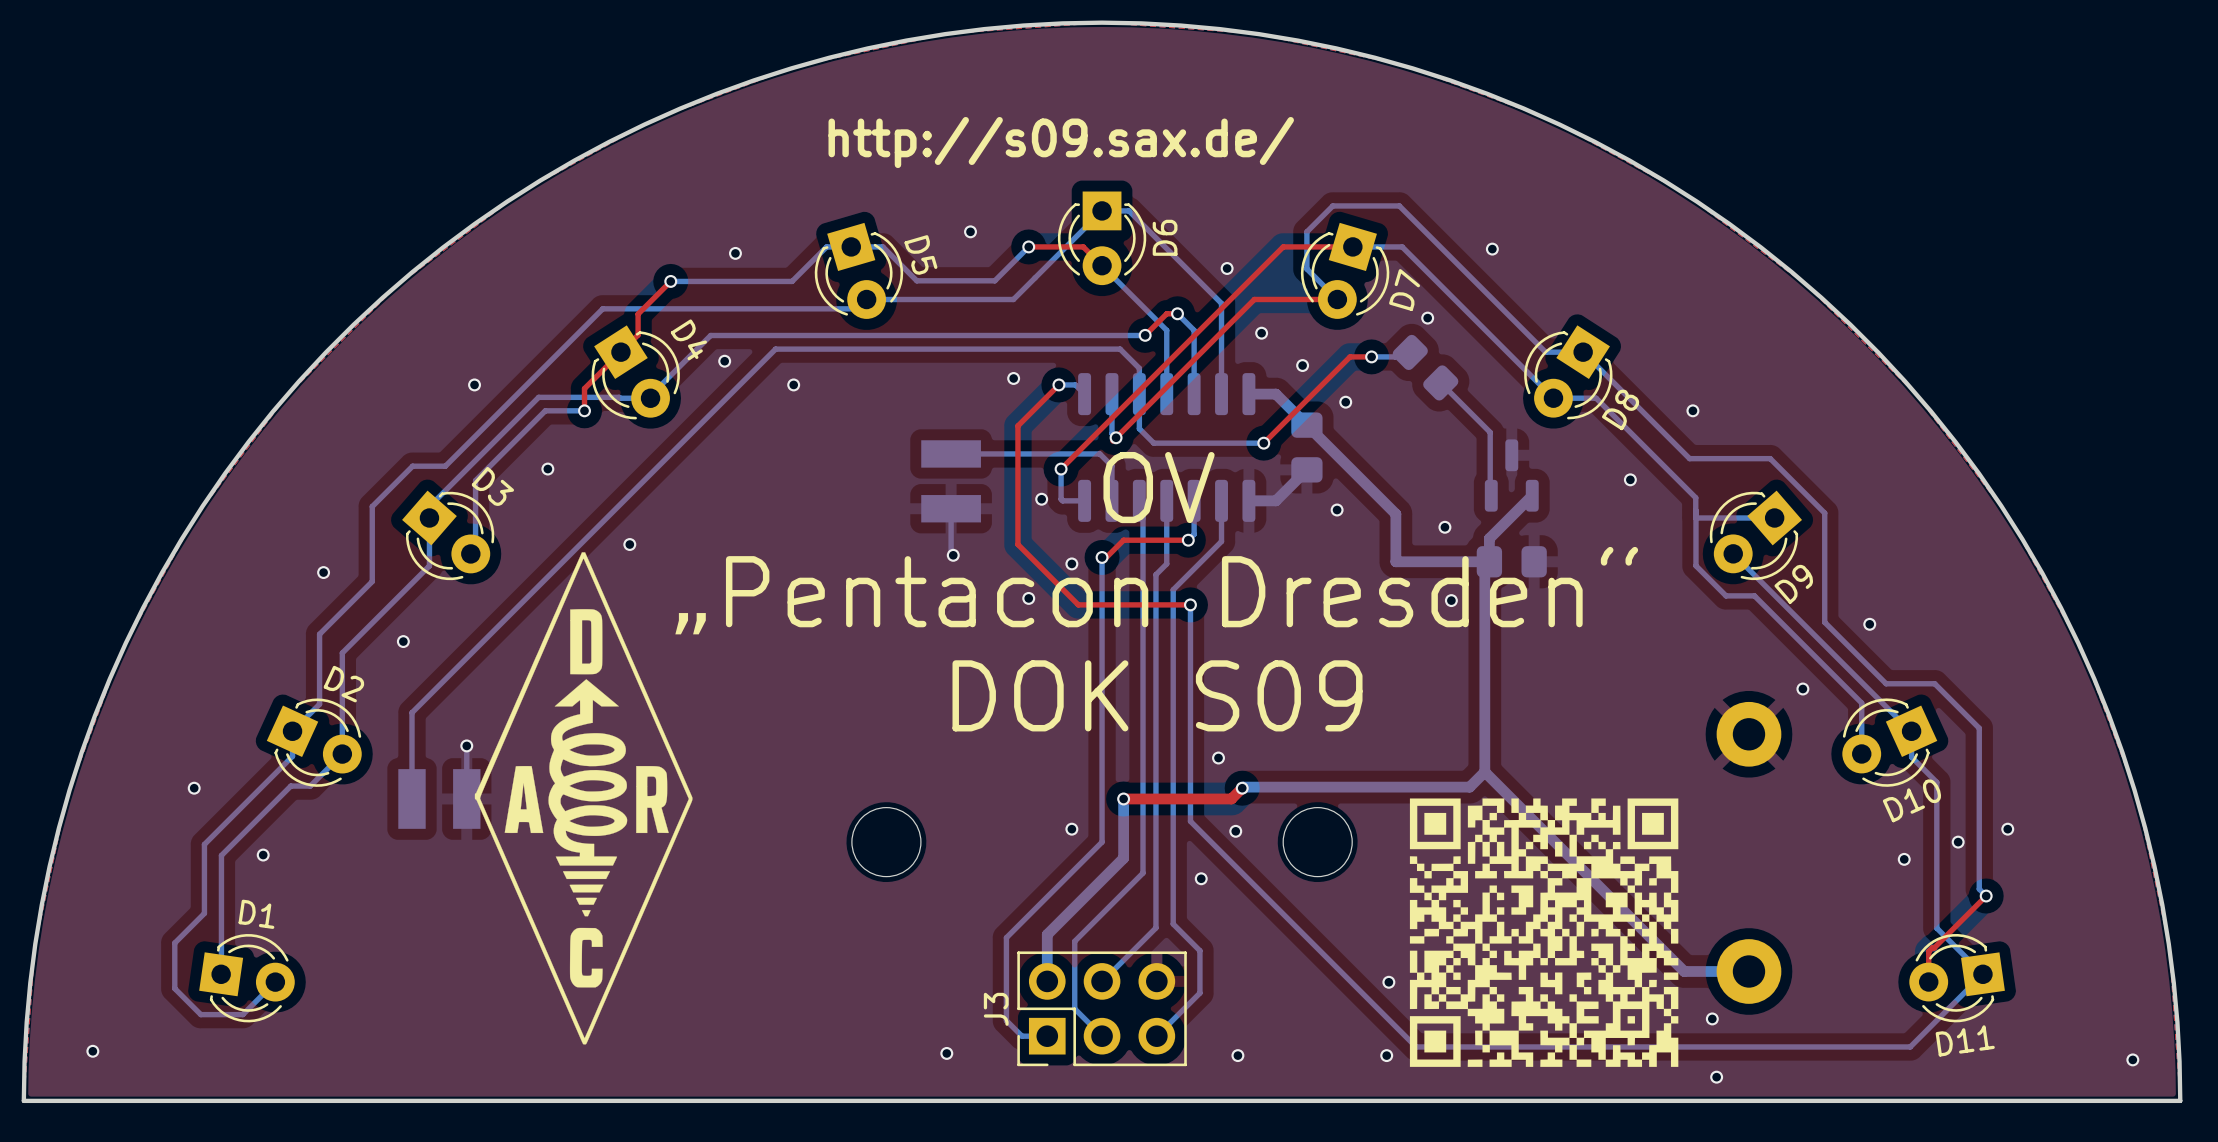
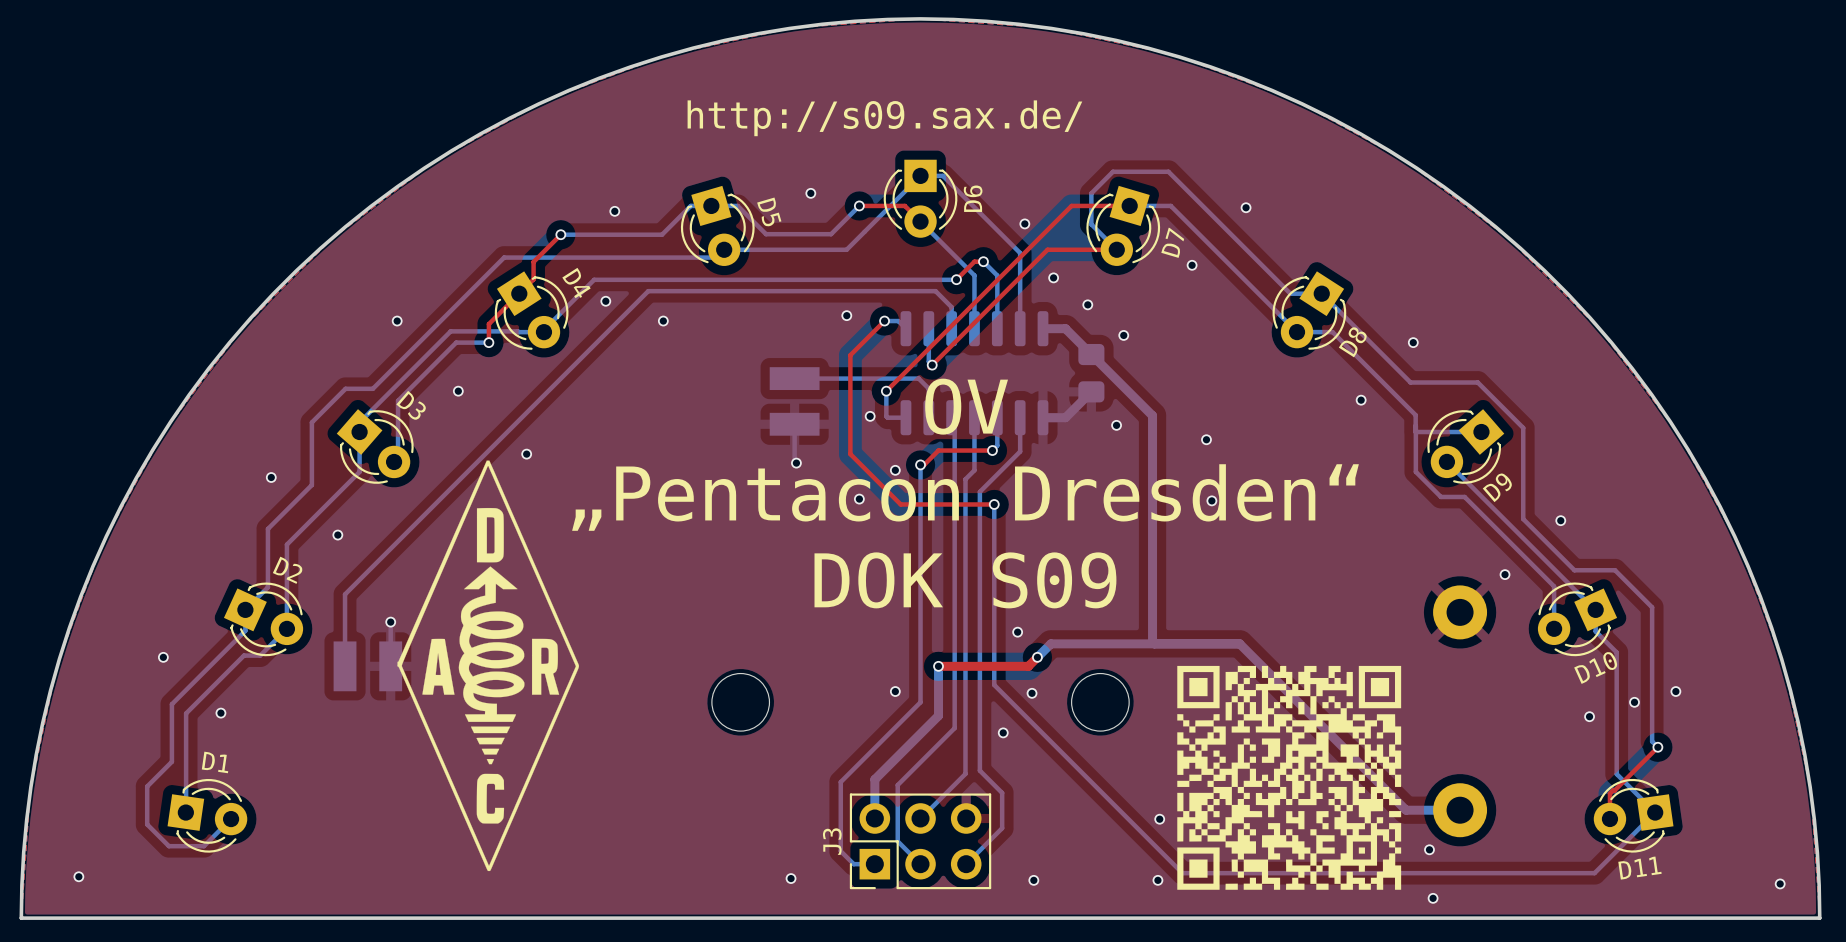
bottom track: (1404, 347) (1395, 356) (1371, 356) -> none
top track: (1371, 356) (1350, 356) (1263, 443) -> none
via: (1371, 356) -> none
part: (1425, 367) -> none
bottom track: (1440, 382) (1490, 432) (1491, 495) -> none
bottom track: (1139, 394) (1139, 428) (1153, 443) (1263, 443) -> none
via: (1263, 443) -> none
part: (1511, 475) -> none
bottom track: (1532, 495) (1489, 538) (1489, 561) -> none
bottom track: (1380, 498) (1395, 514) (1395, 561) (1484, 561) (1484, 772) (1469, 787) (1243, 787) -> (1152, 415) (1152, 642) (1154, 643)
part: (1511, 561) -> none
bottom track: none -> (1239, 643) (1050, 643) (1038, 656)

